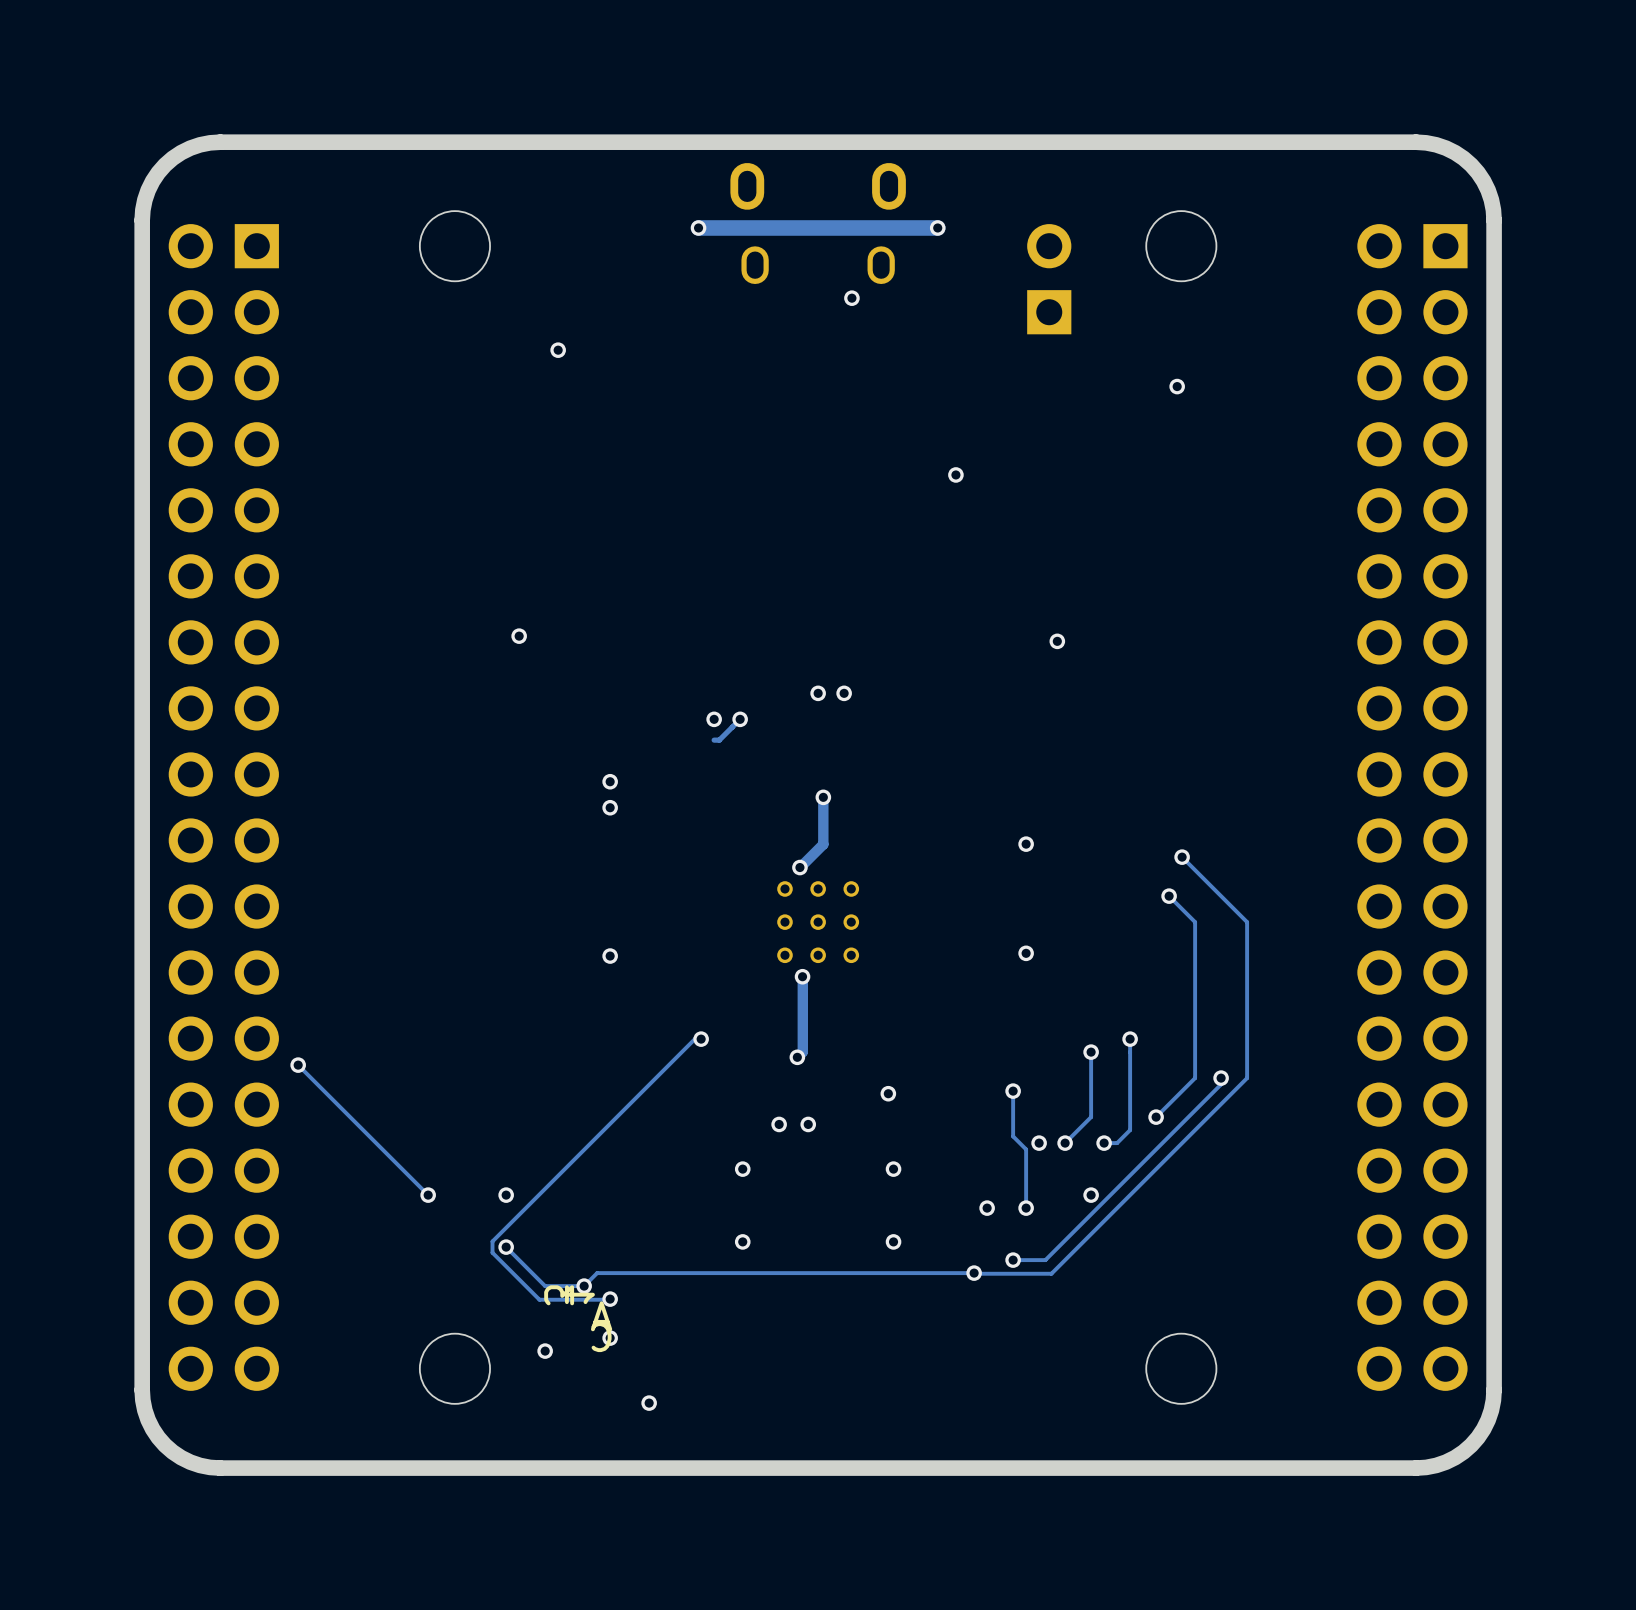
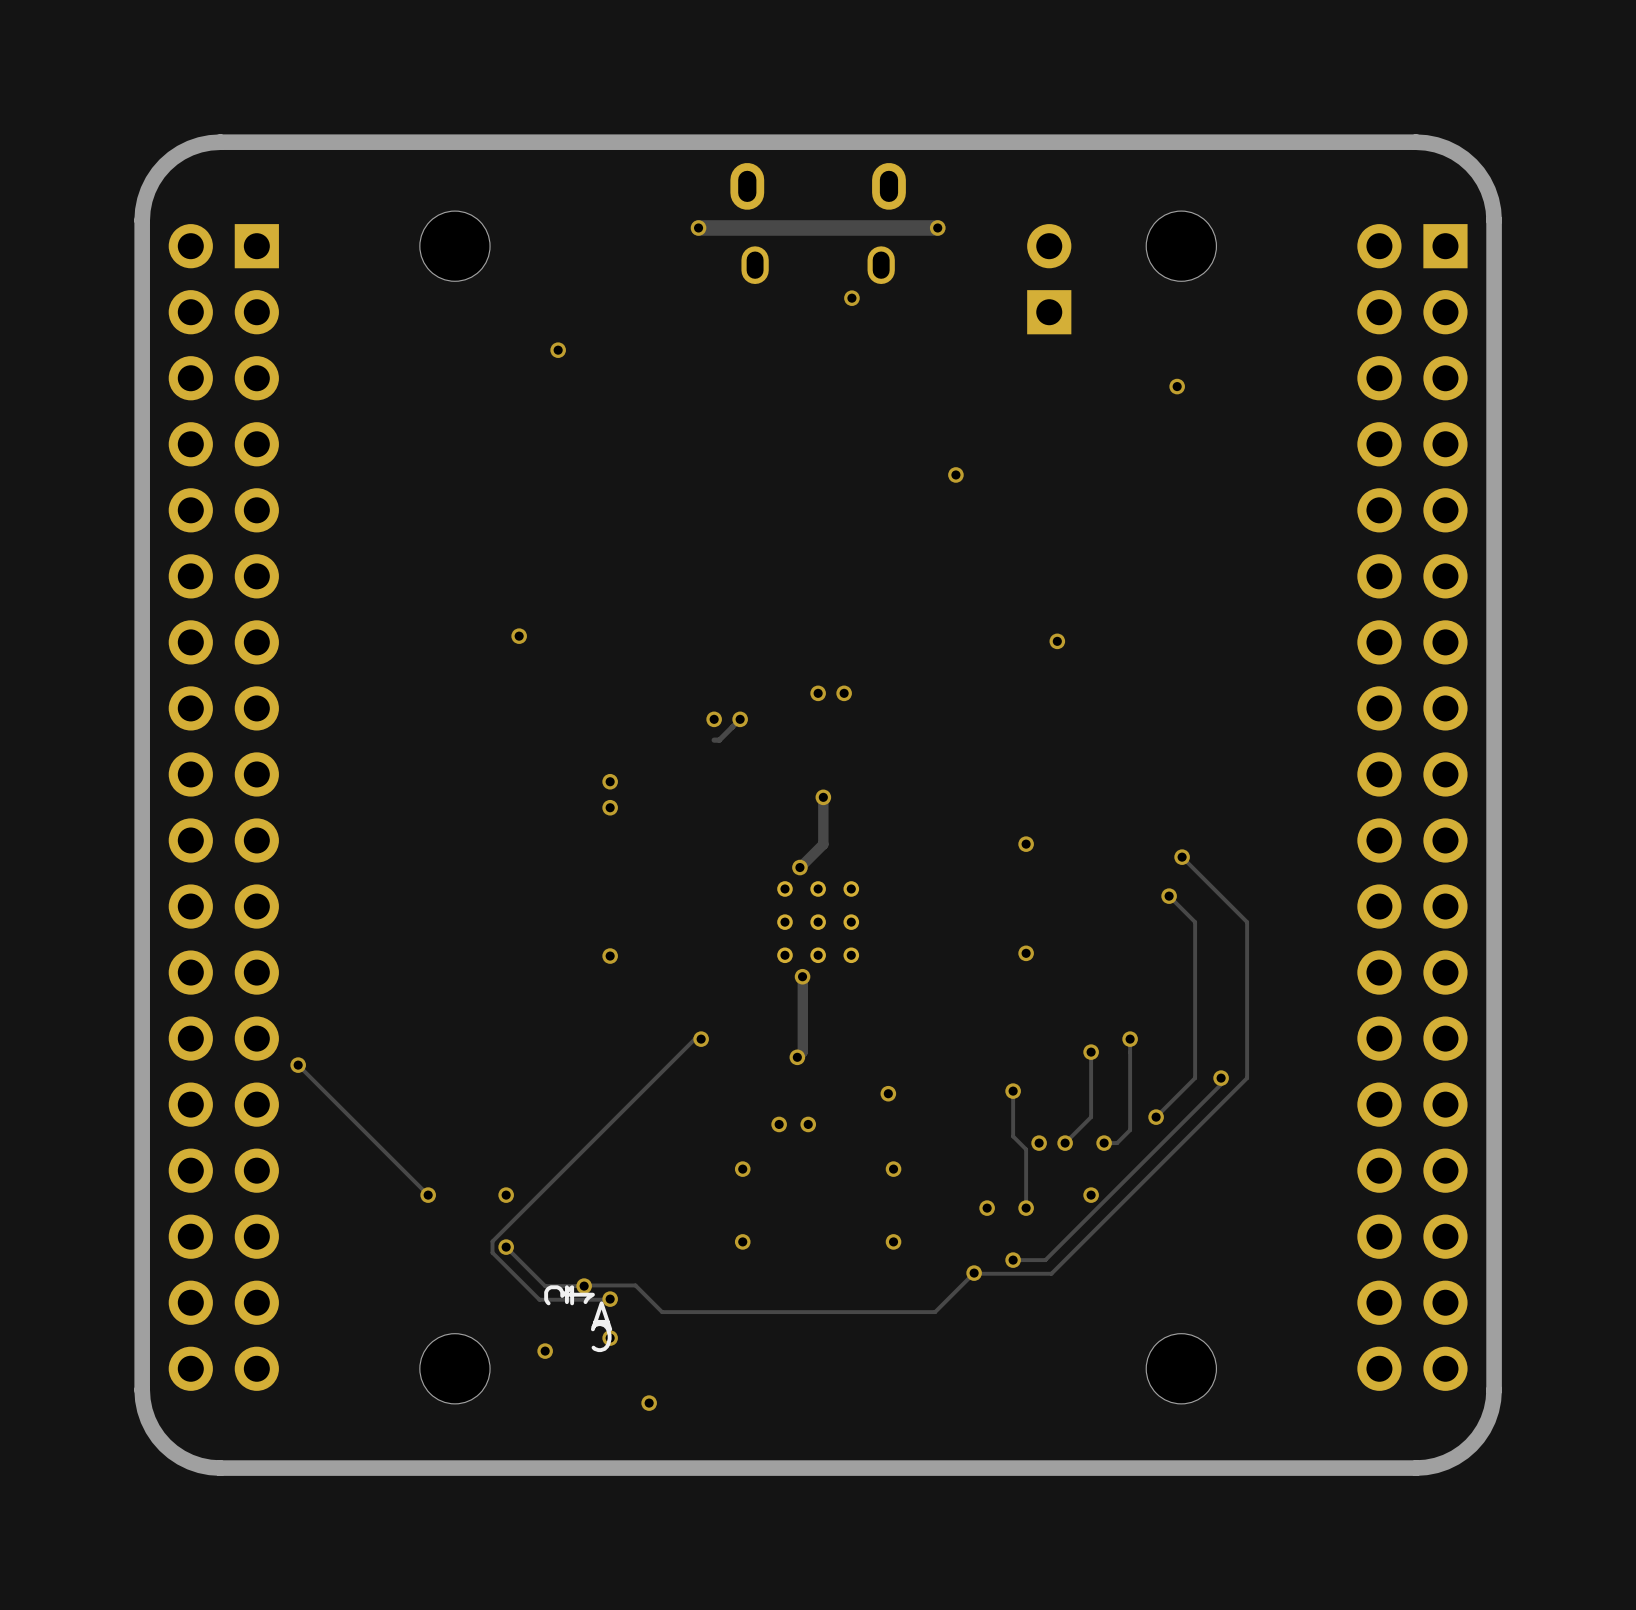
track: (974, 1273) (597, 1273) (584, 1285) -> (974, 1273) (935, 1312) (662, 1312) (635, 1285) (584, 1285)

